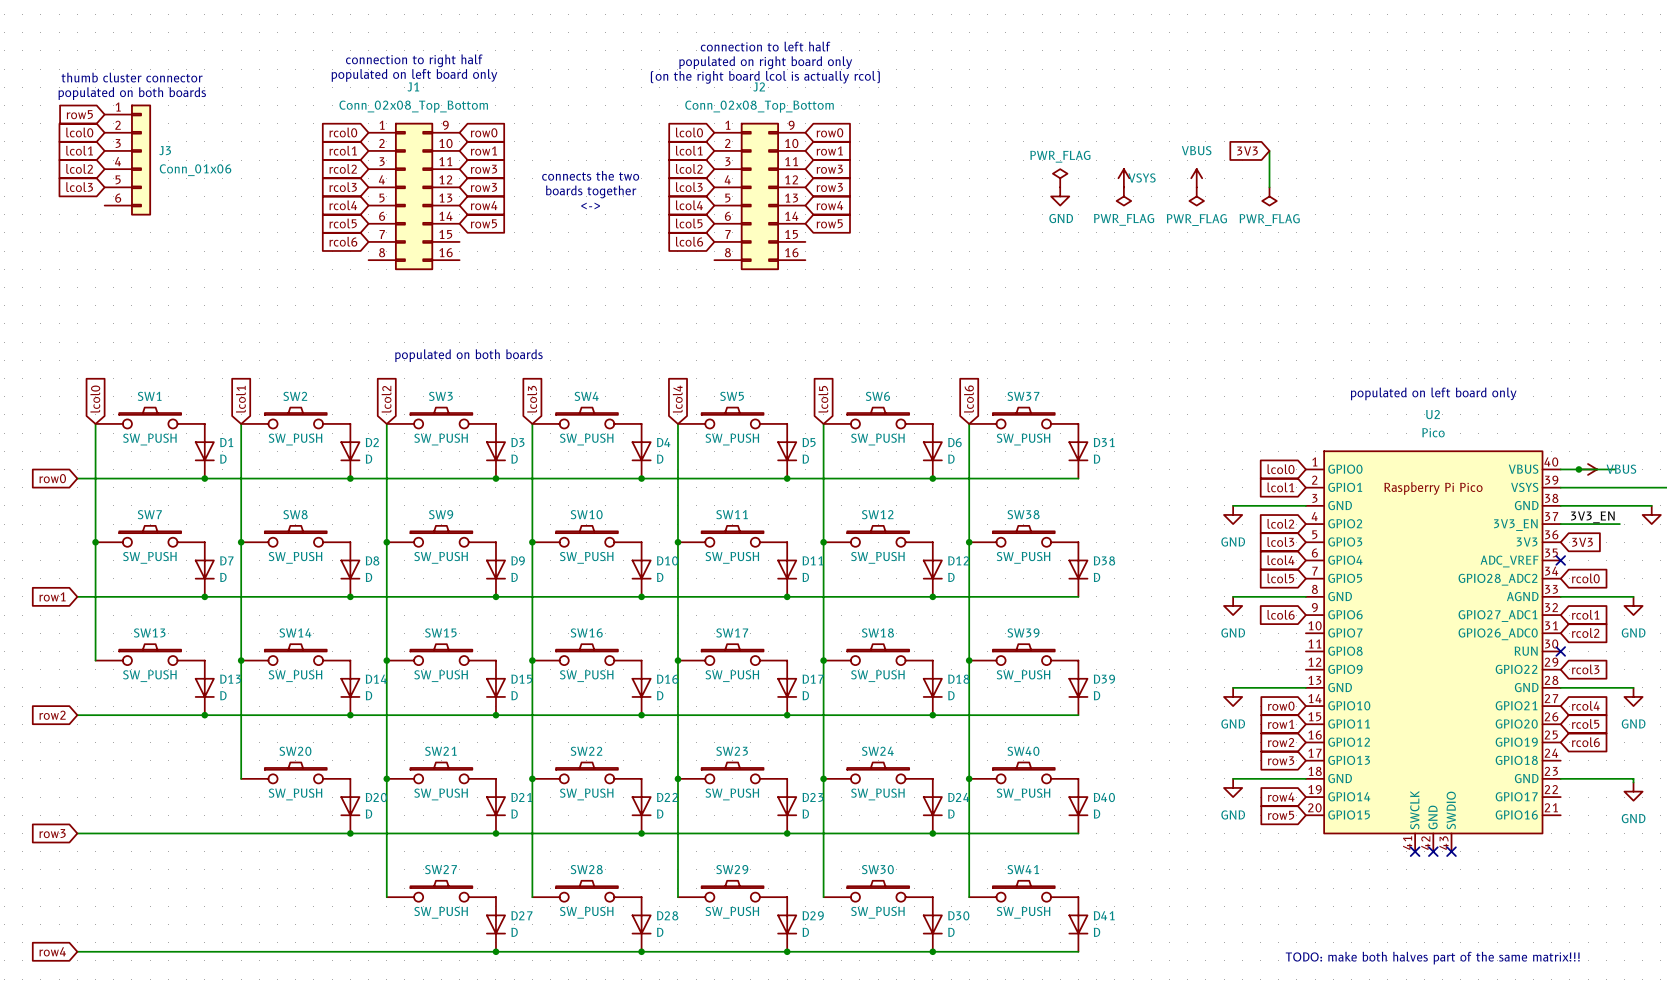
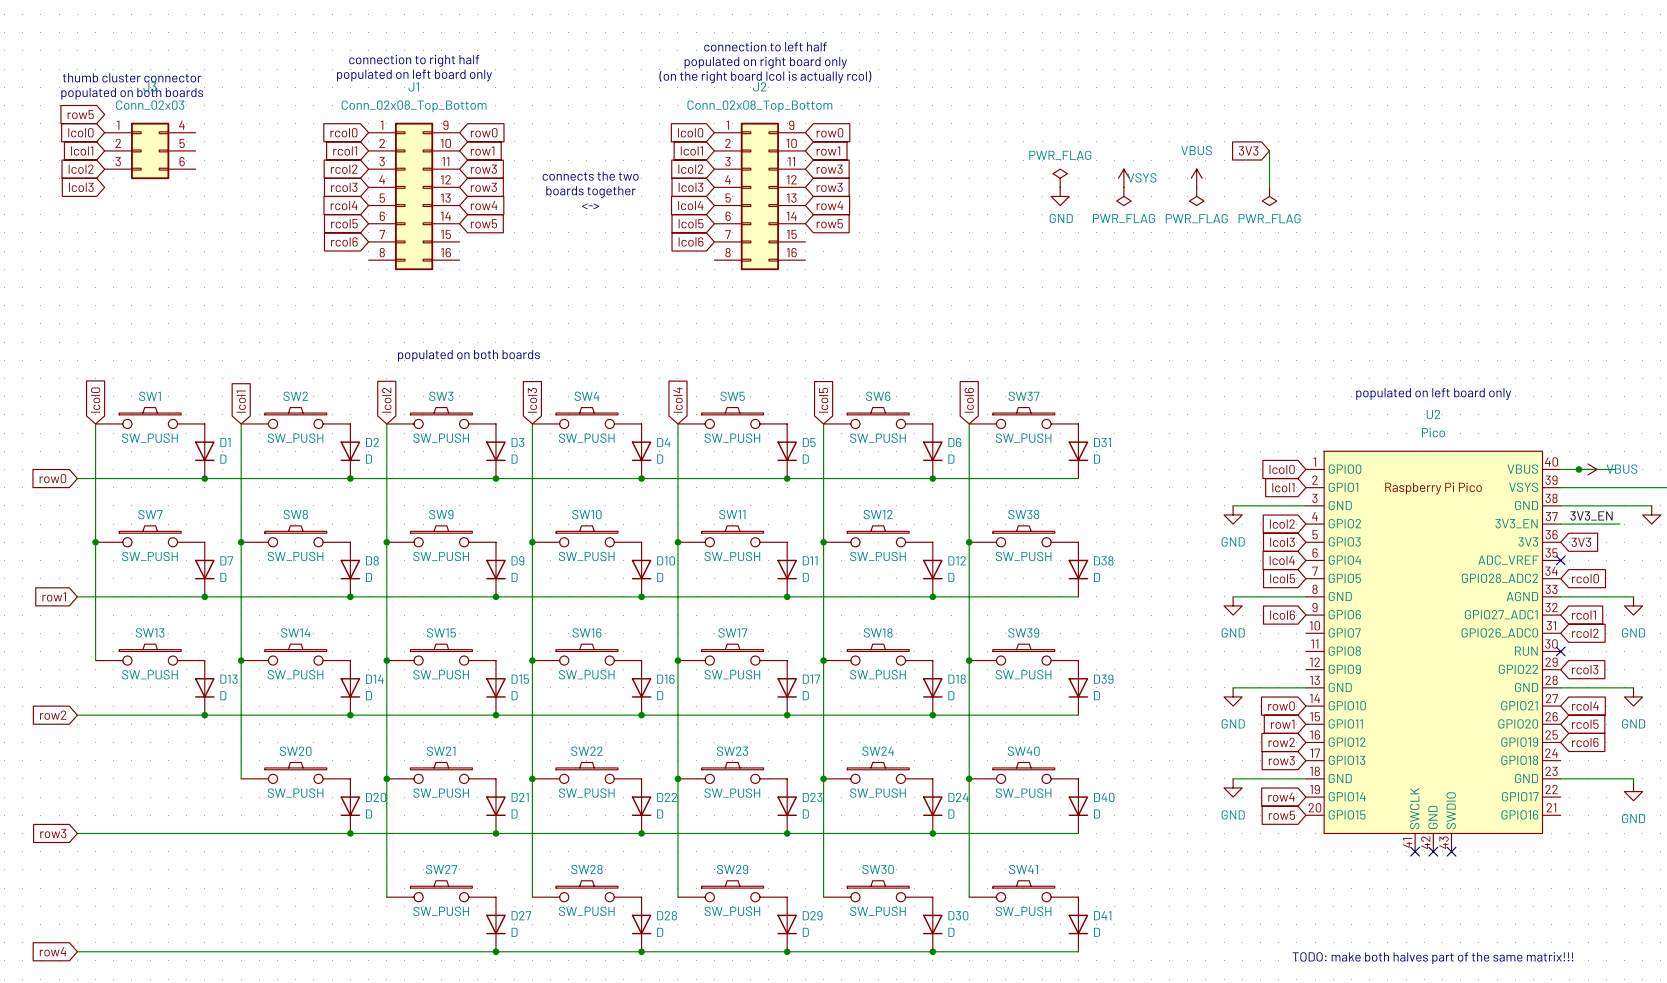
J3 symbol: [104, 104, 152, 216] -> [104, 122, 196, 180]
J3 name position: J3 (165, 150) -> J3 (149, 86)
J3 value: Conn_01x06 (195, 170) -> Conn_02x03 (150, 105)

